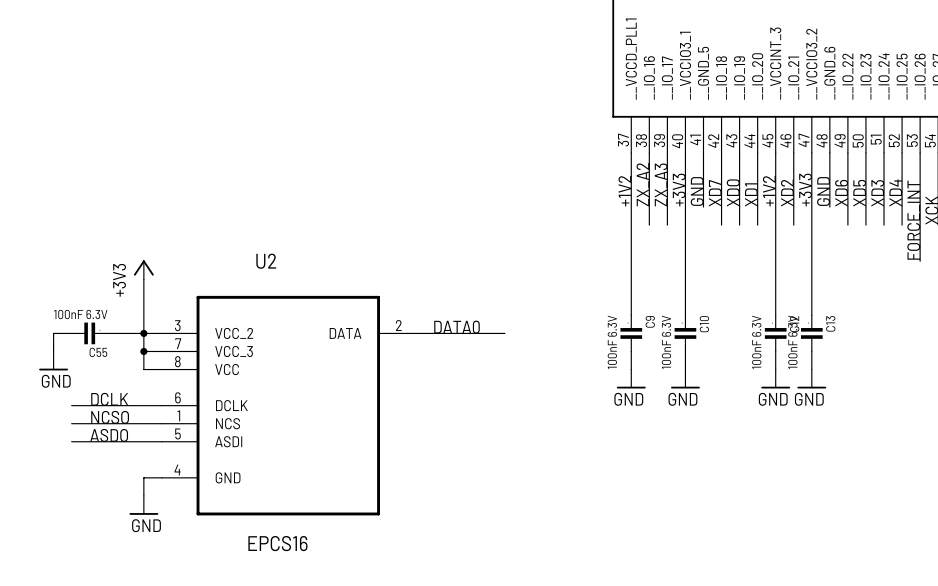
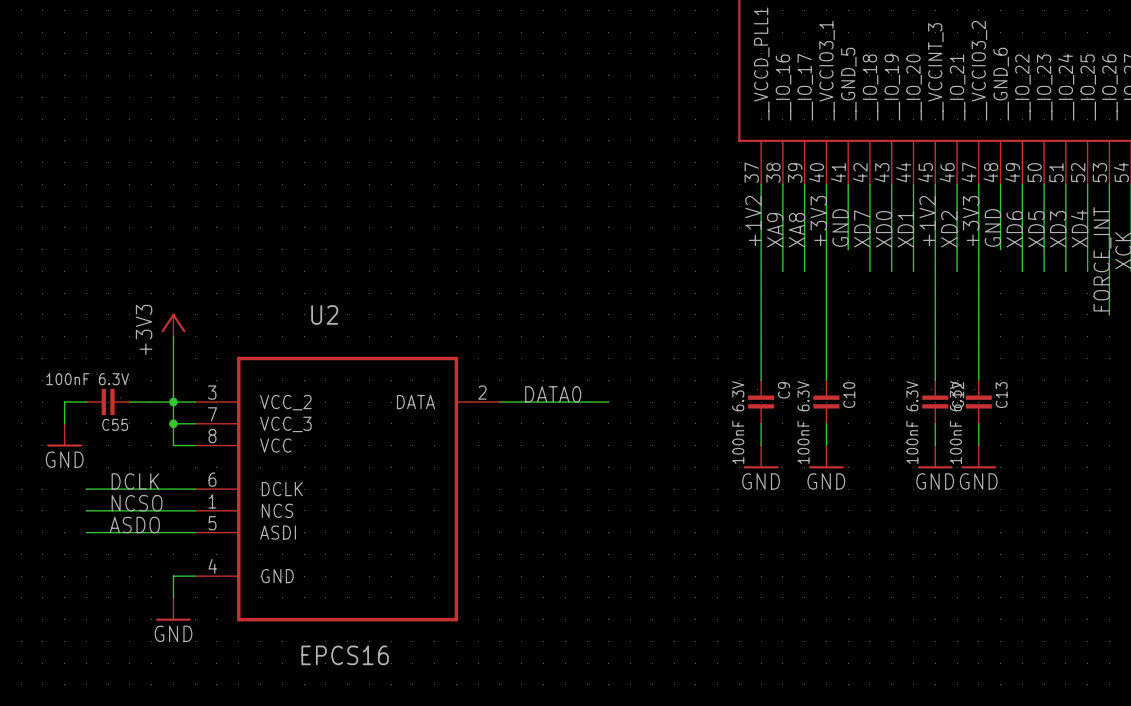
label: ZX_A2 (642, 184) -> XA9 (775, 230)
label: ZX_A3 (661, 184) -> XA8 (797, 230)

